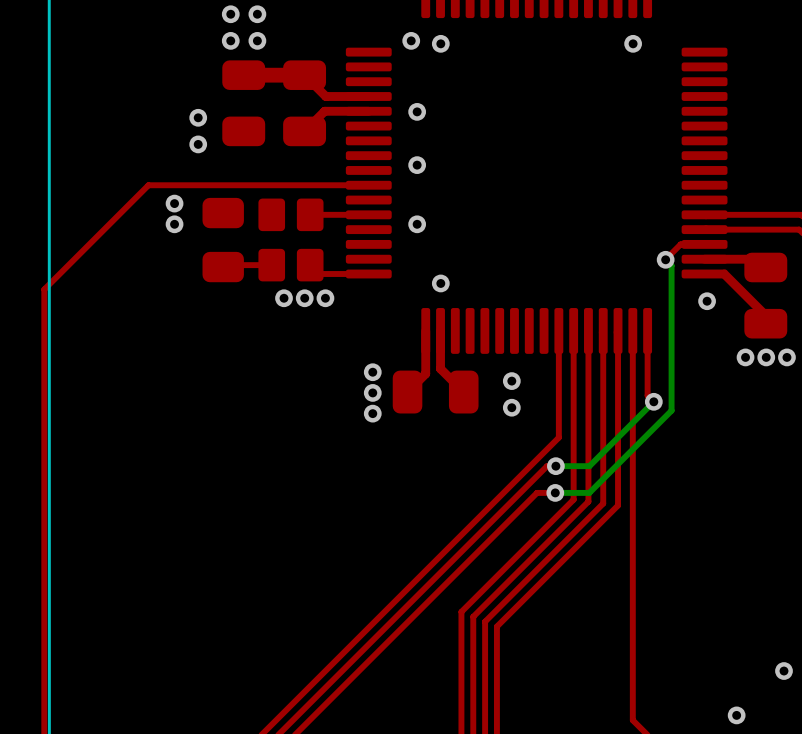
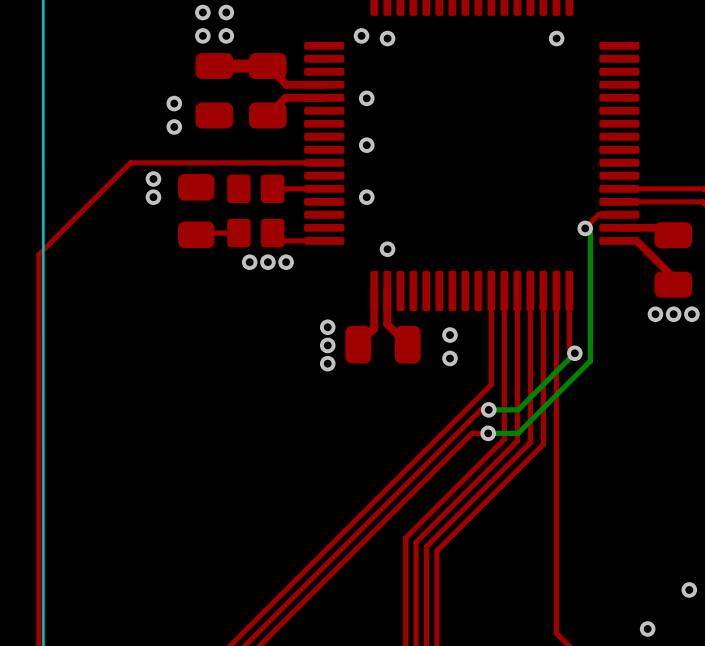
via: (707, 301) -> none

